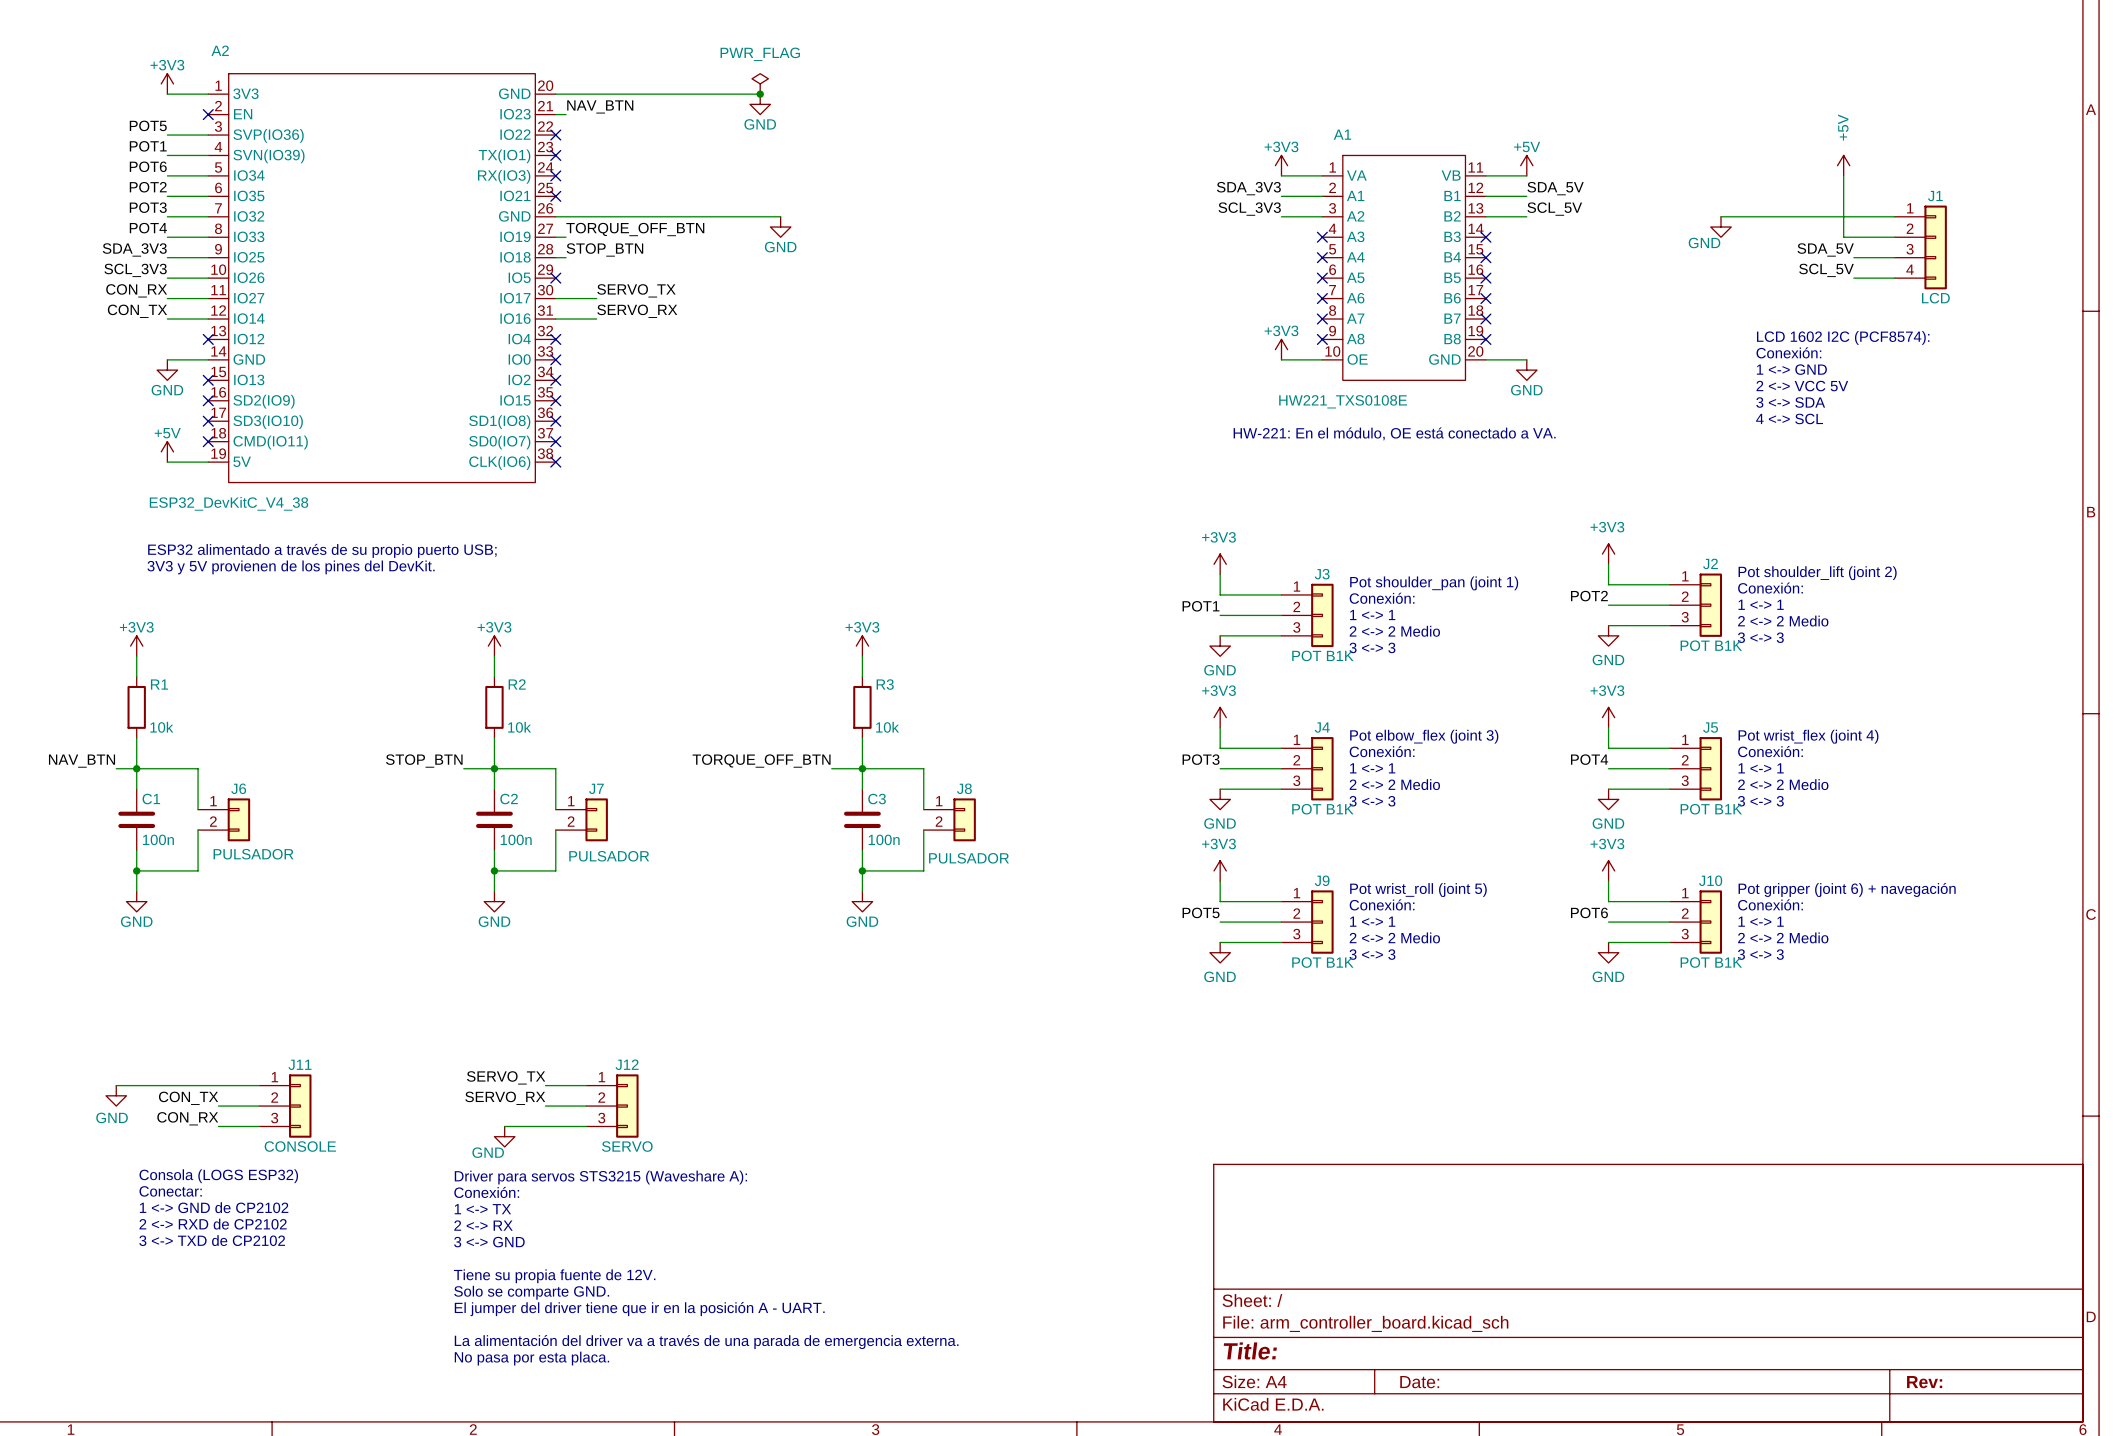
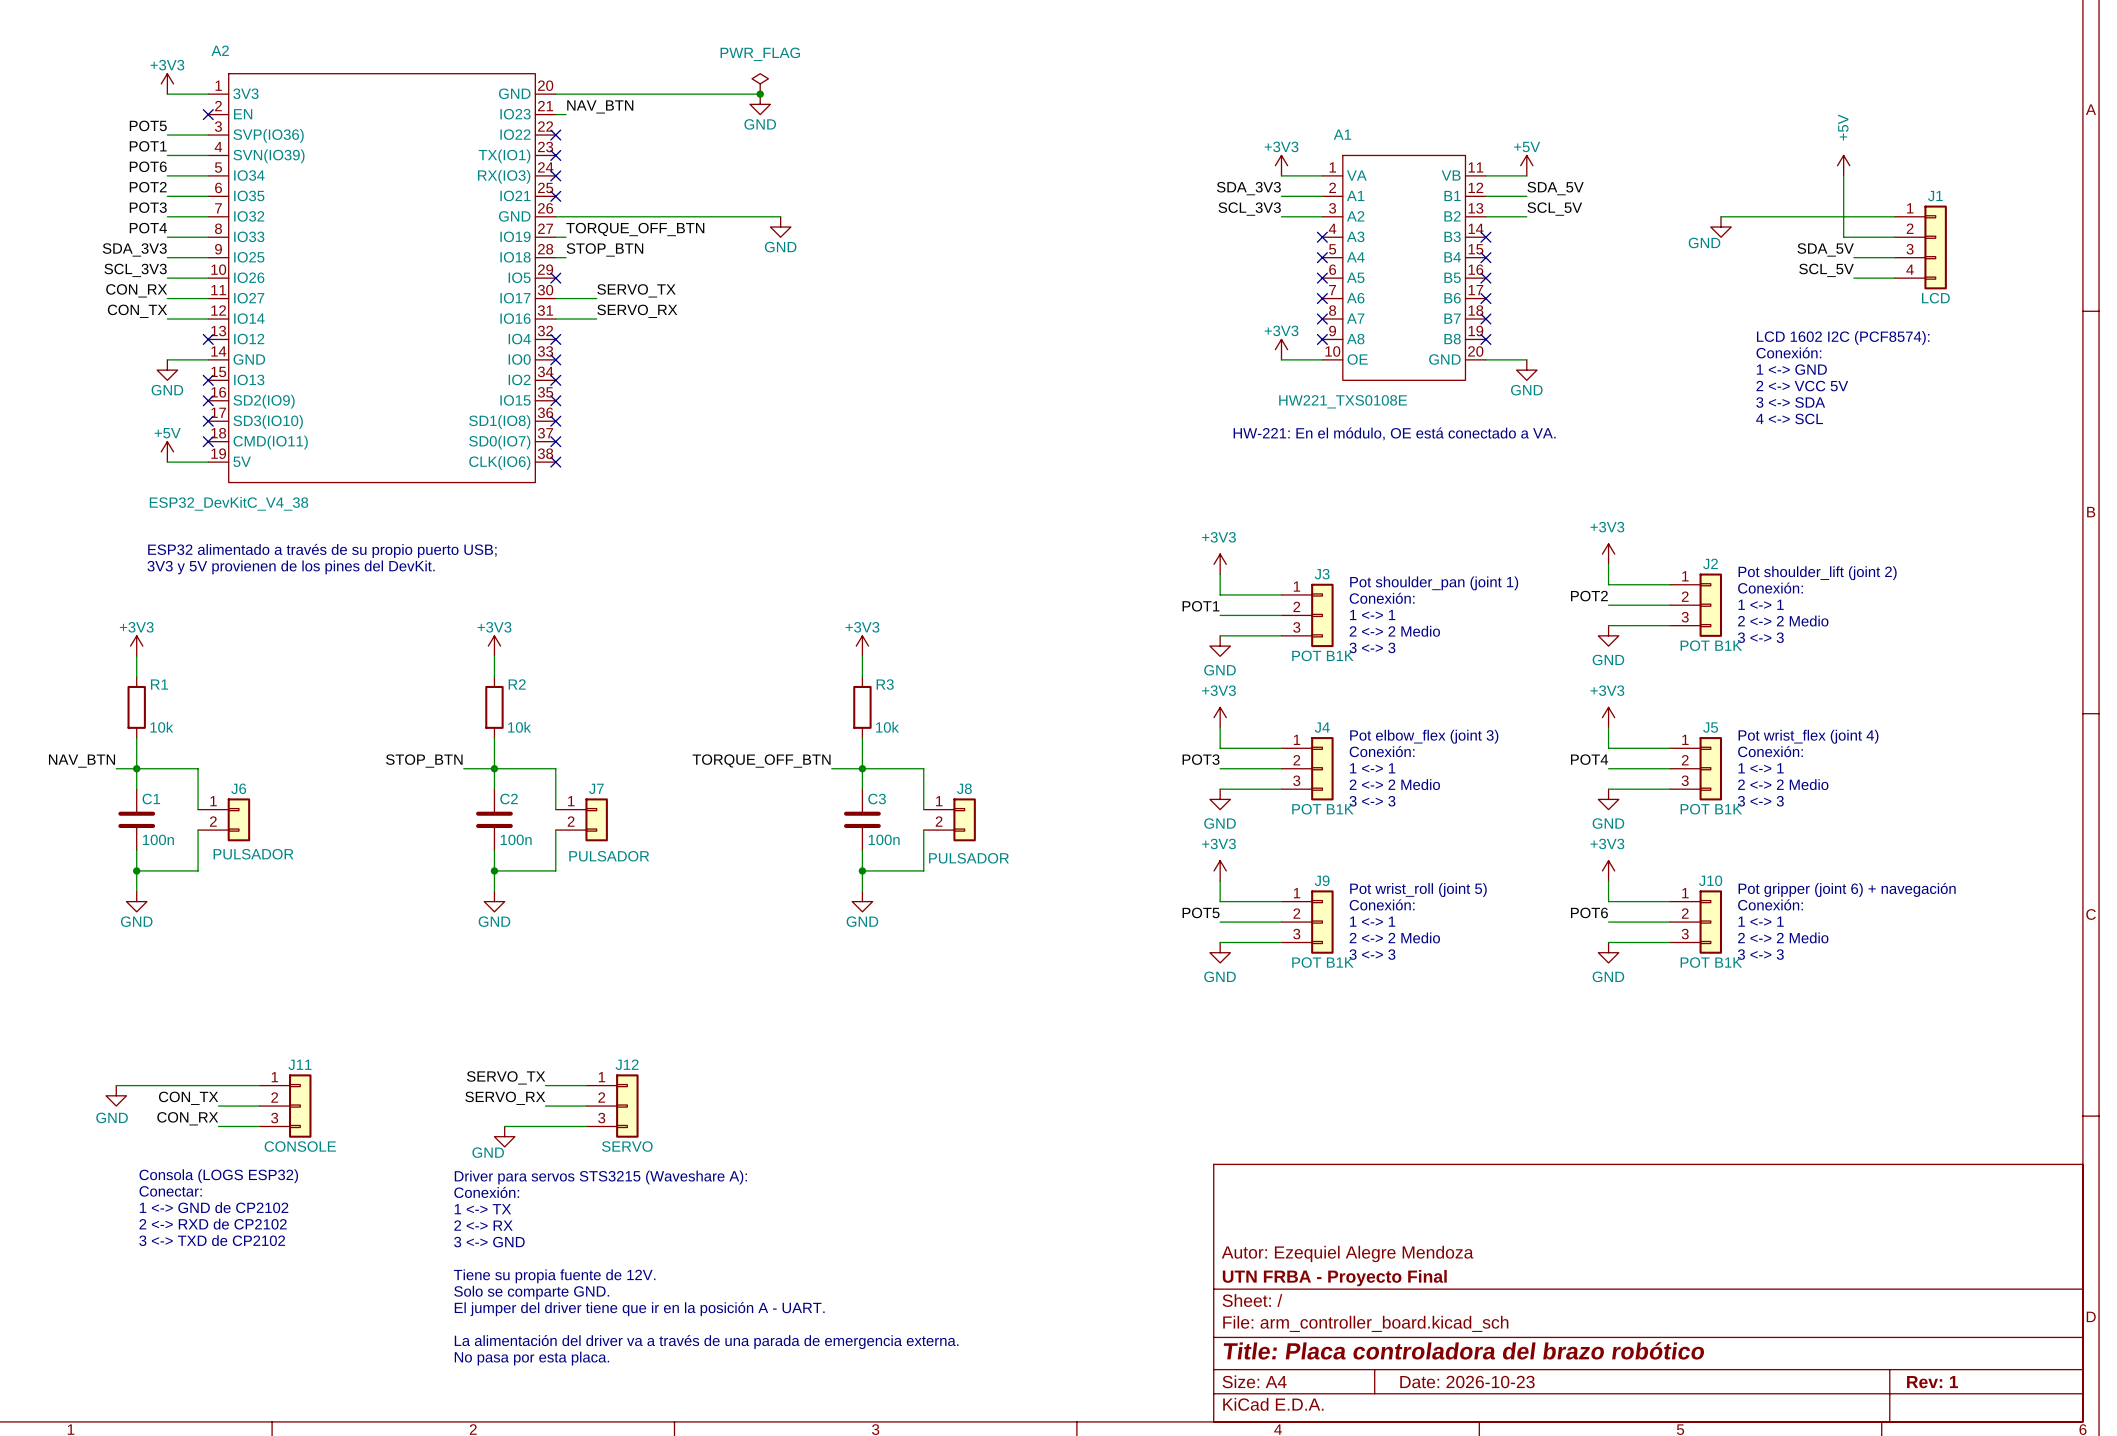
title block: none -> Autor: Ezequiel Alegre Mendoza (1347, 1253)
title block: none -> UTN FRBA - Proyecto Final (1334, 1278)
title block: Title: (1250, 1351) -> Title: Placa controladora del brazo robótico (1464, 1350)
title block: Date: (1419, 1382) -> Date: 2026-10-23 (1467, 1382)
title block: Rev: (1924, 1382) -> Rev: 1 (1932, 1382)

